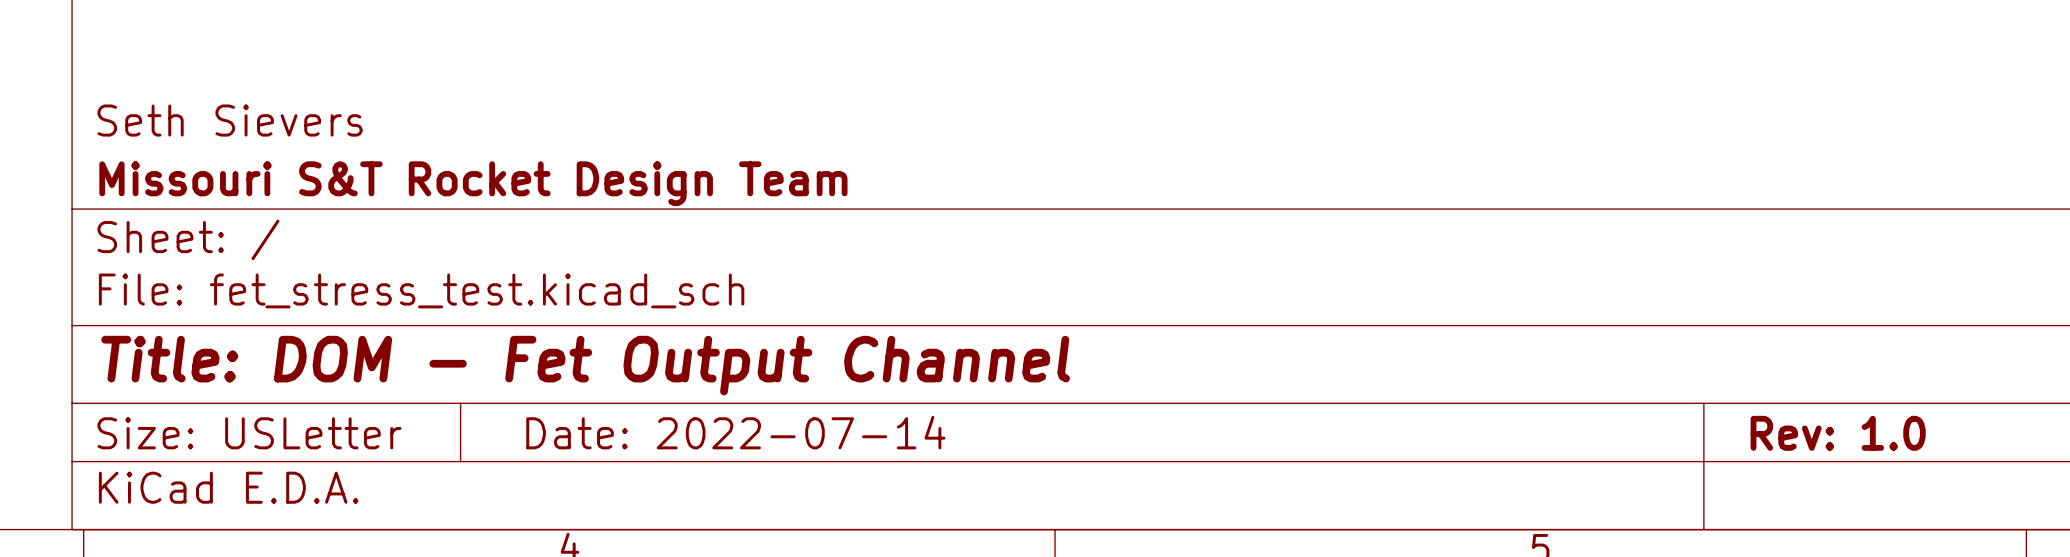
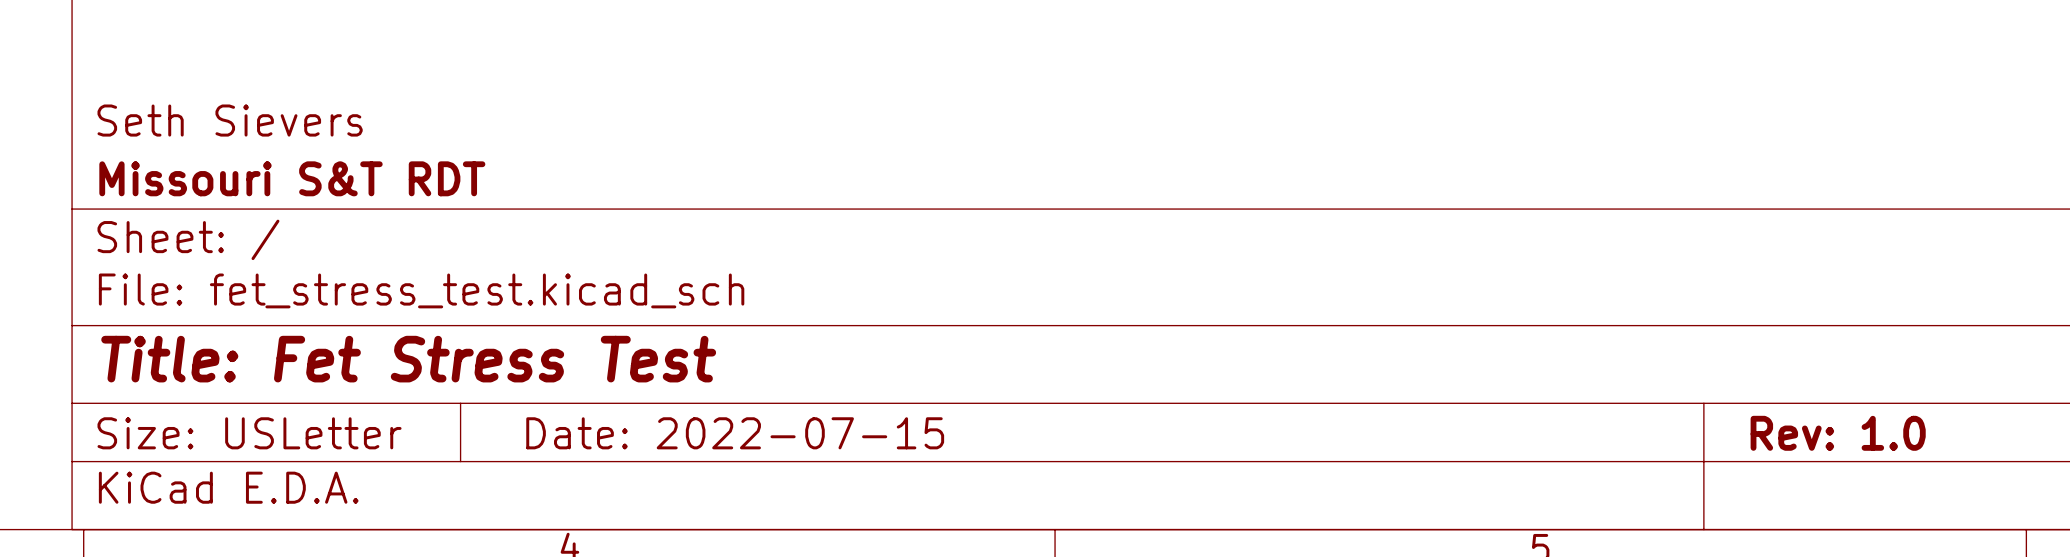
title block: Missouri S&T Rocket Design Team (473, 183) -> Missouri S&T RDT (292, 178)
title block: Title: DOM - Fet Output Channel (585, 365) -> Title: Fet Stress Test (408, 359)
title block: Date: 2022-07-14 (735, 432) -> Date: 2022-07-15 (735, 433)

